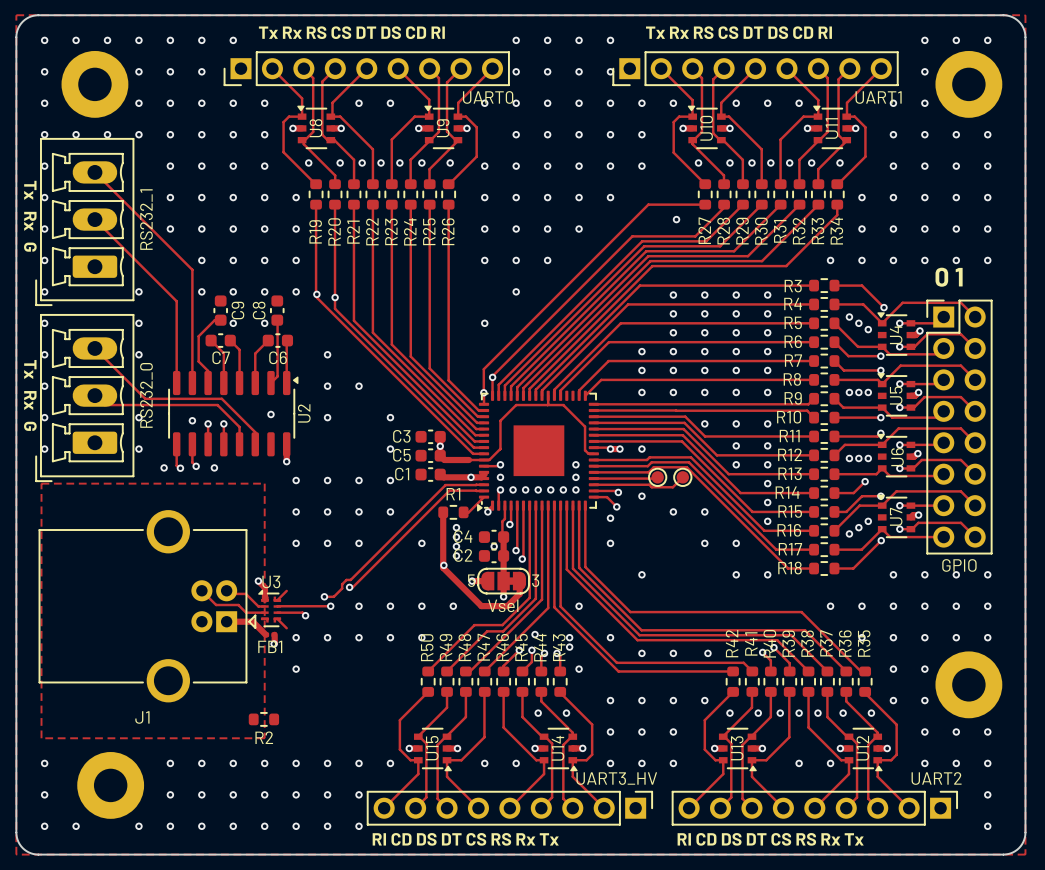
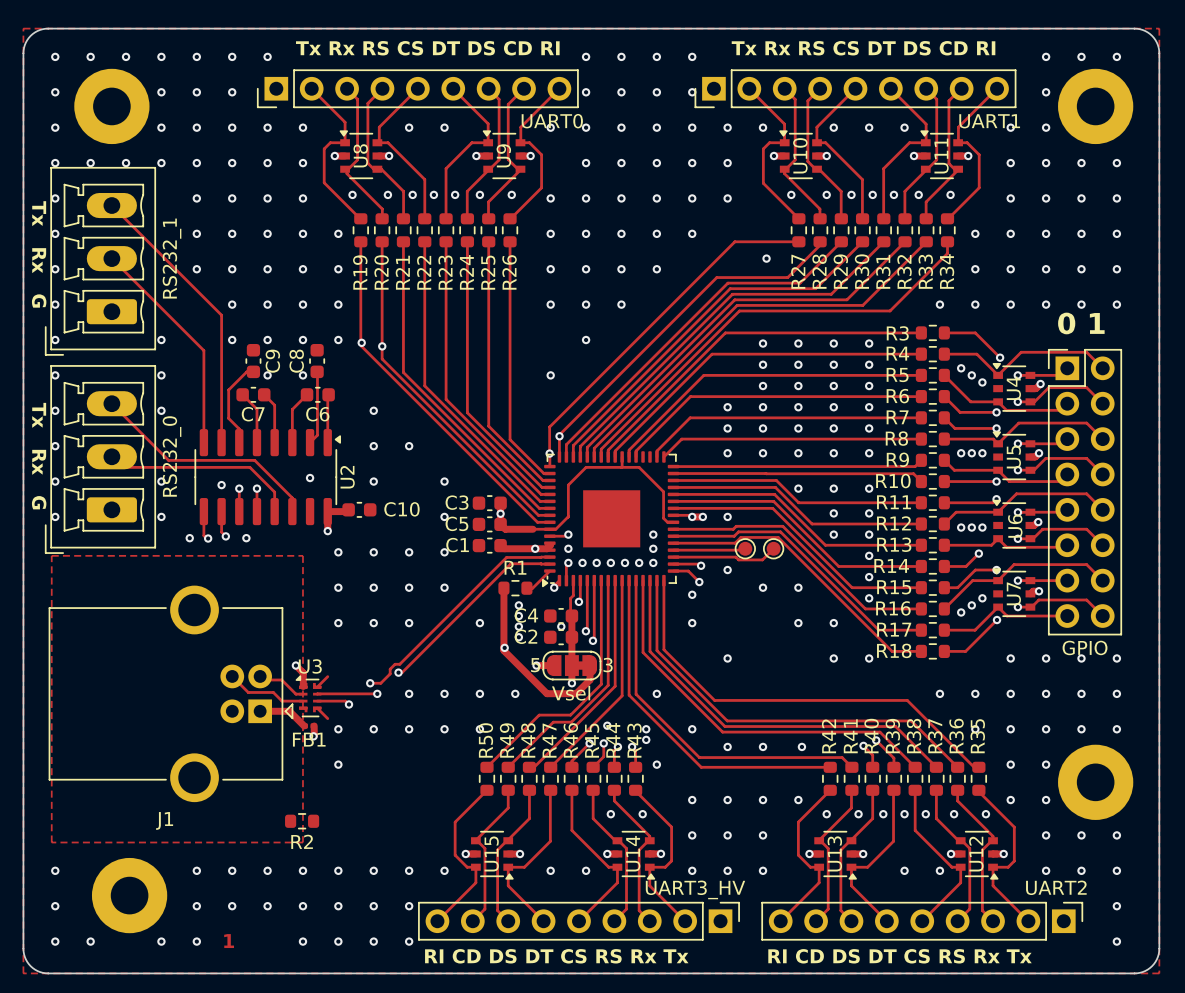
track: none -> (348, 509) (346, 511) (327, 511)
C10: none -> (359, 509)
text: none -> 1 (229, 941)
via: (201, 826) -> none
via: (233, 826) -> none

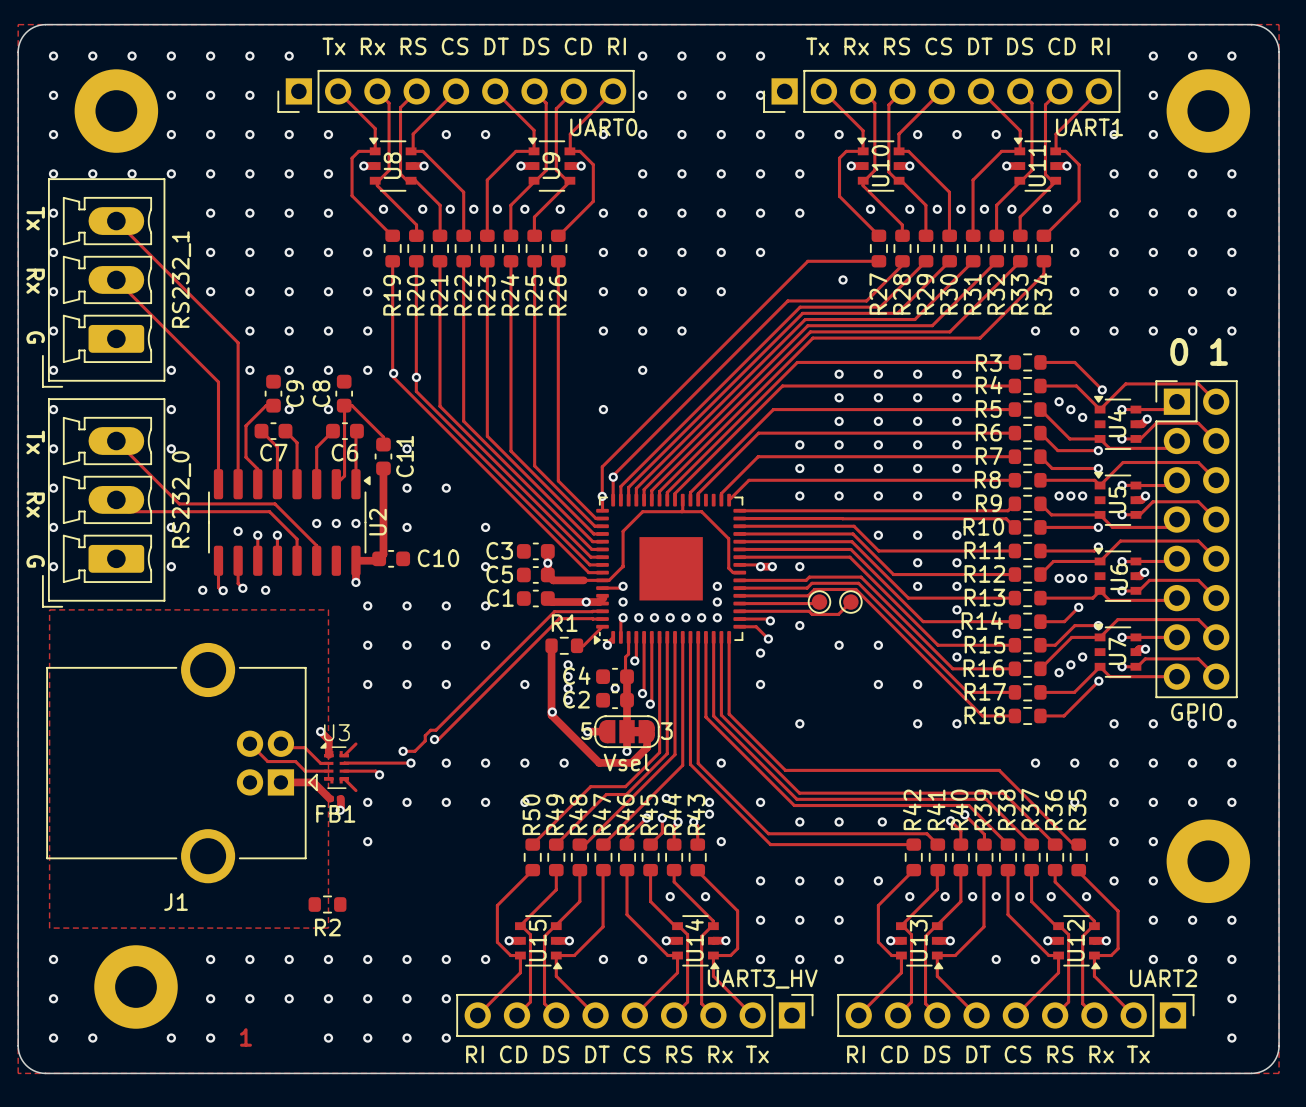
track: none -> (344, 405) (352, 405) (383, 437) (383, 444)
C11: none -> (383, 456)
track: none -> (383, 468) (383, 554) (379, 558)
via: none -> (316, 523)
via: none -> (355, 523)

